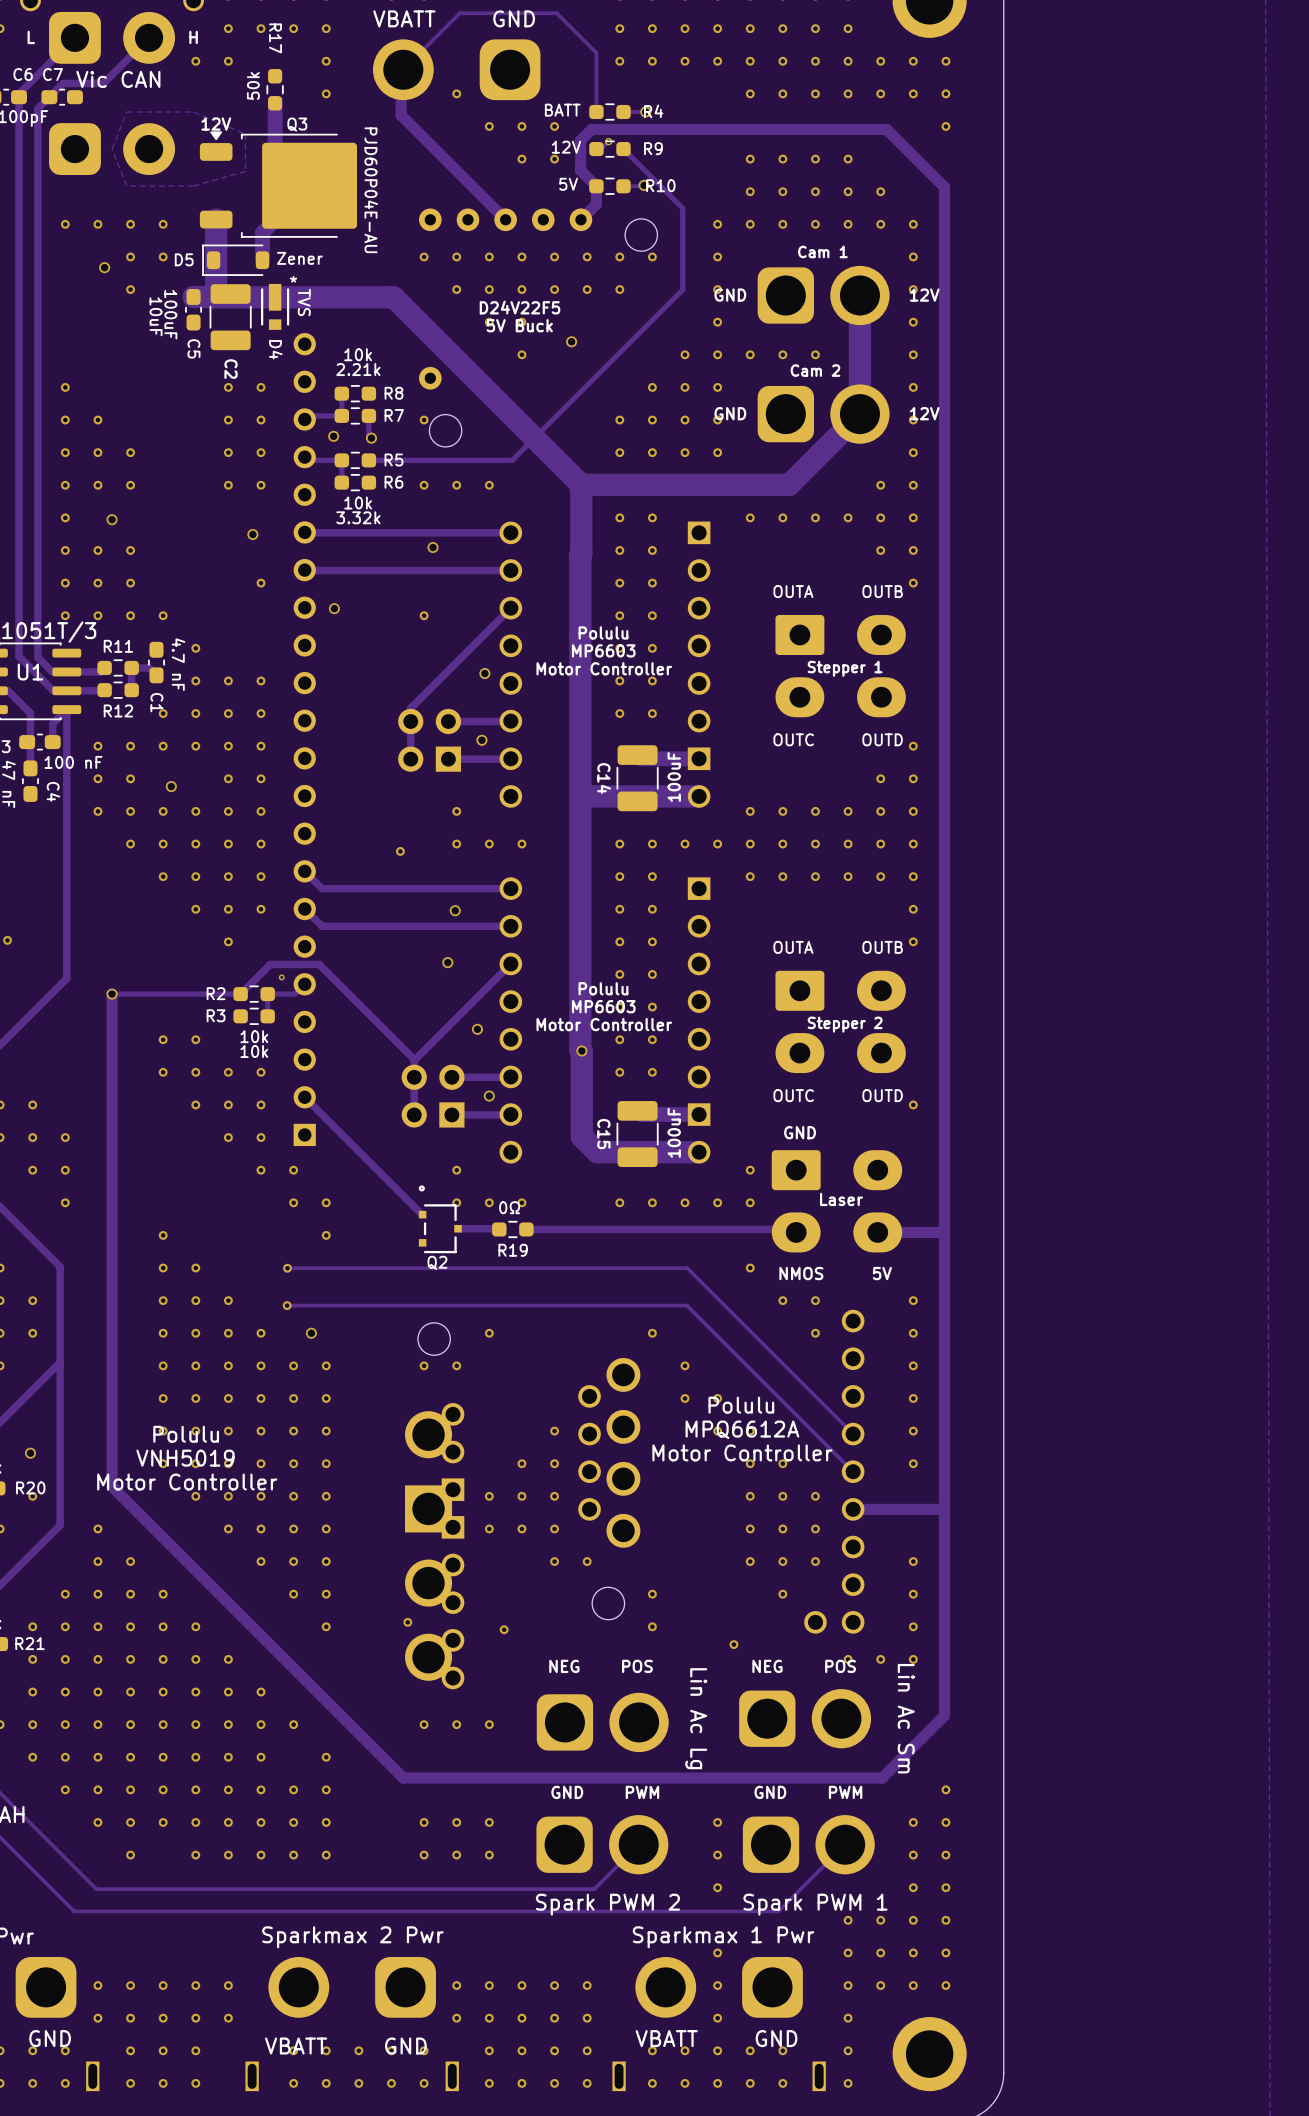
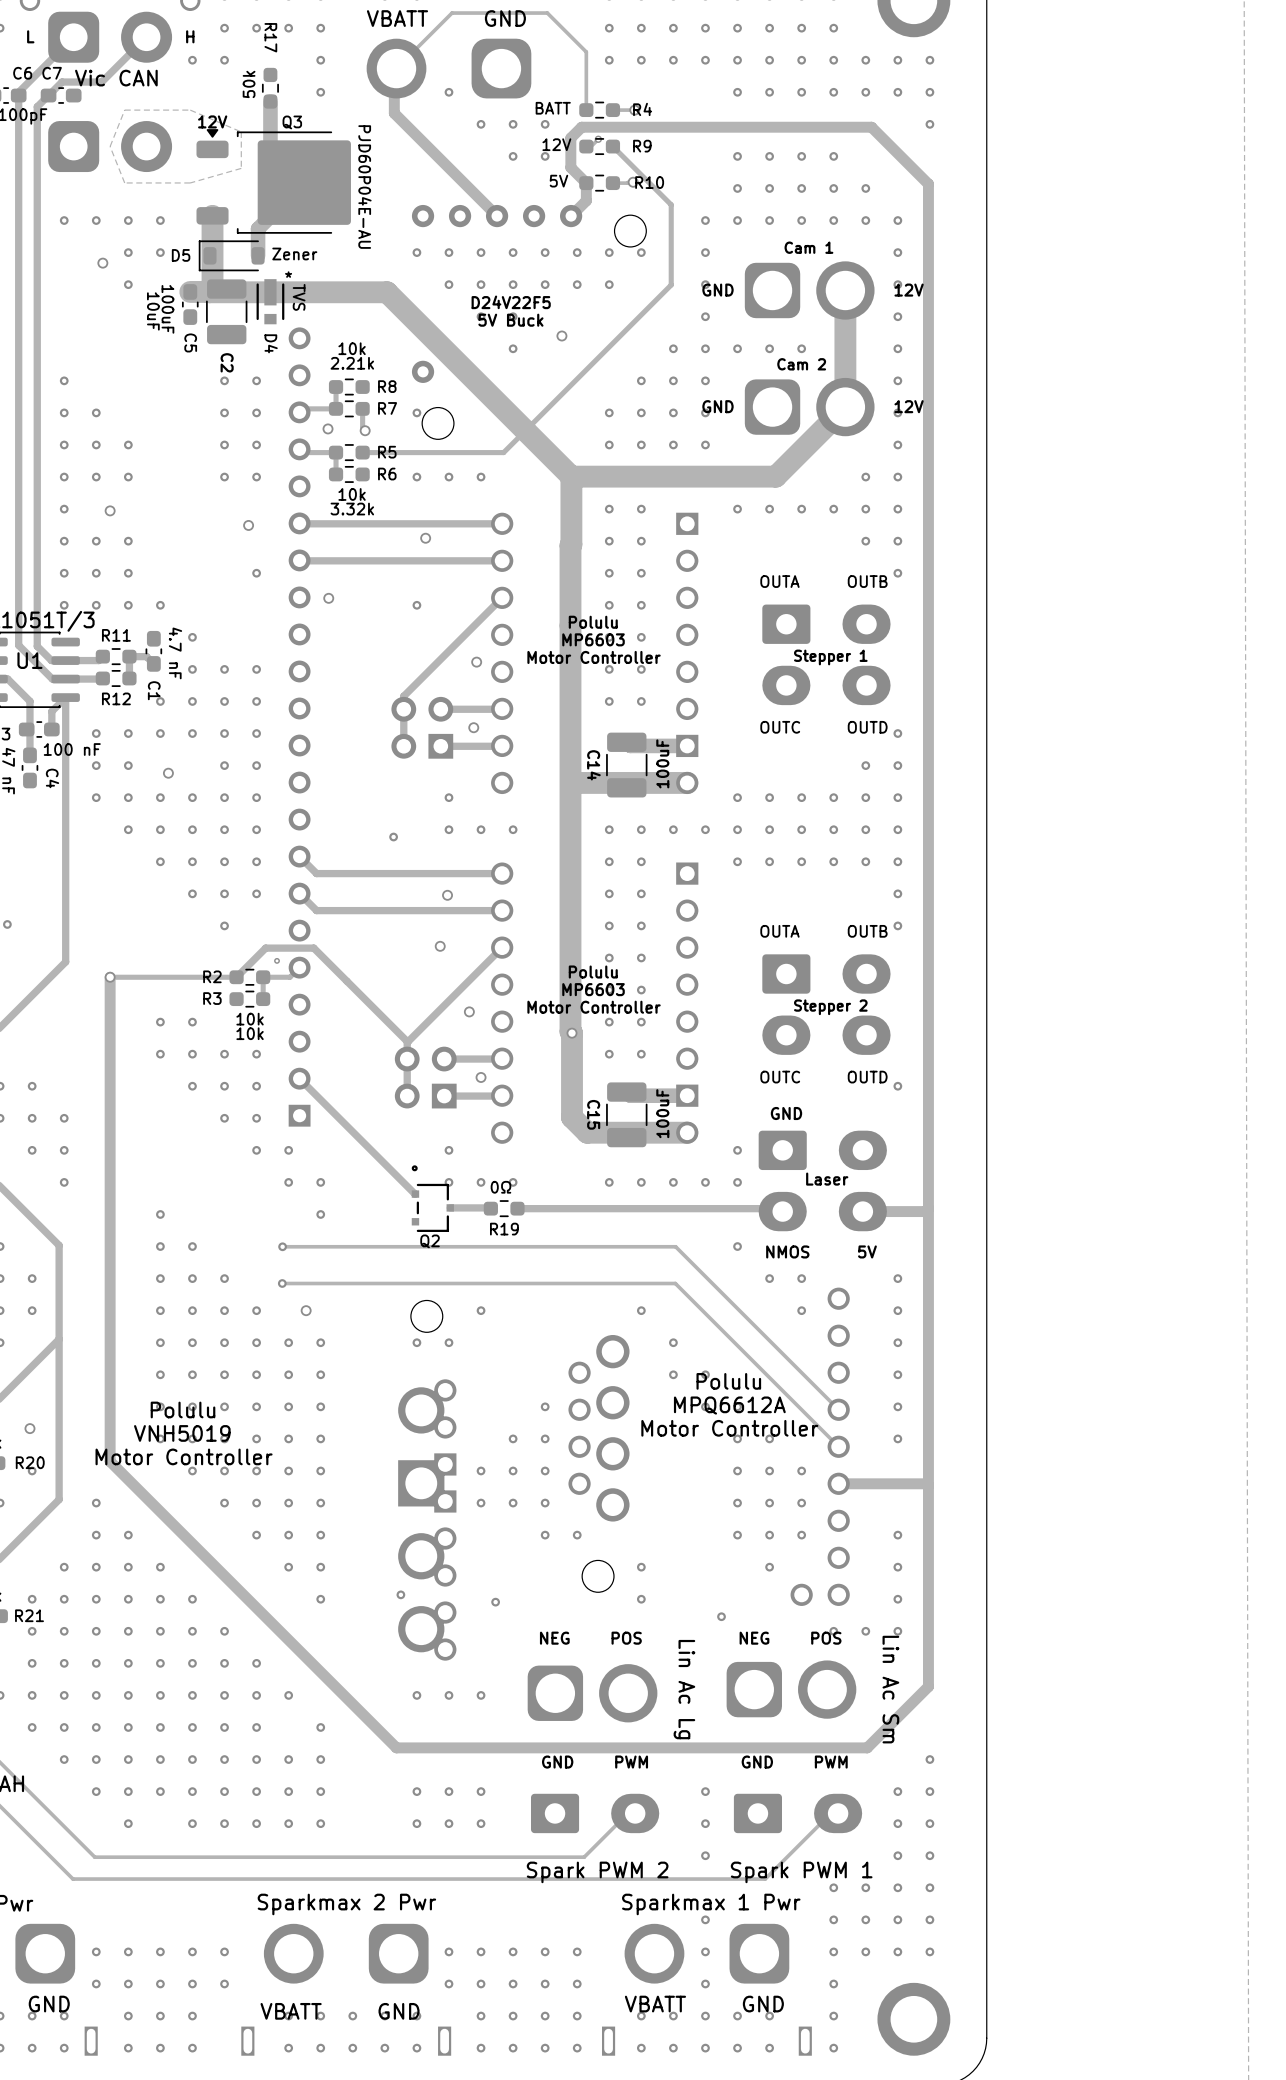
part footprint: [536, 1815, 669, 1875] -> [530, 1793, 660, 1834]
part footprint: [742, 1815, 875, 1875] -> [733, 1793, 863, 1834]

